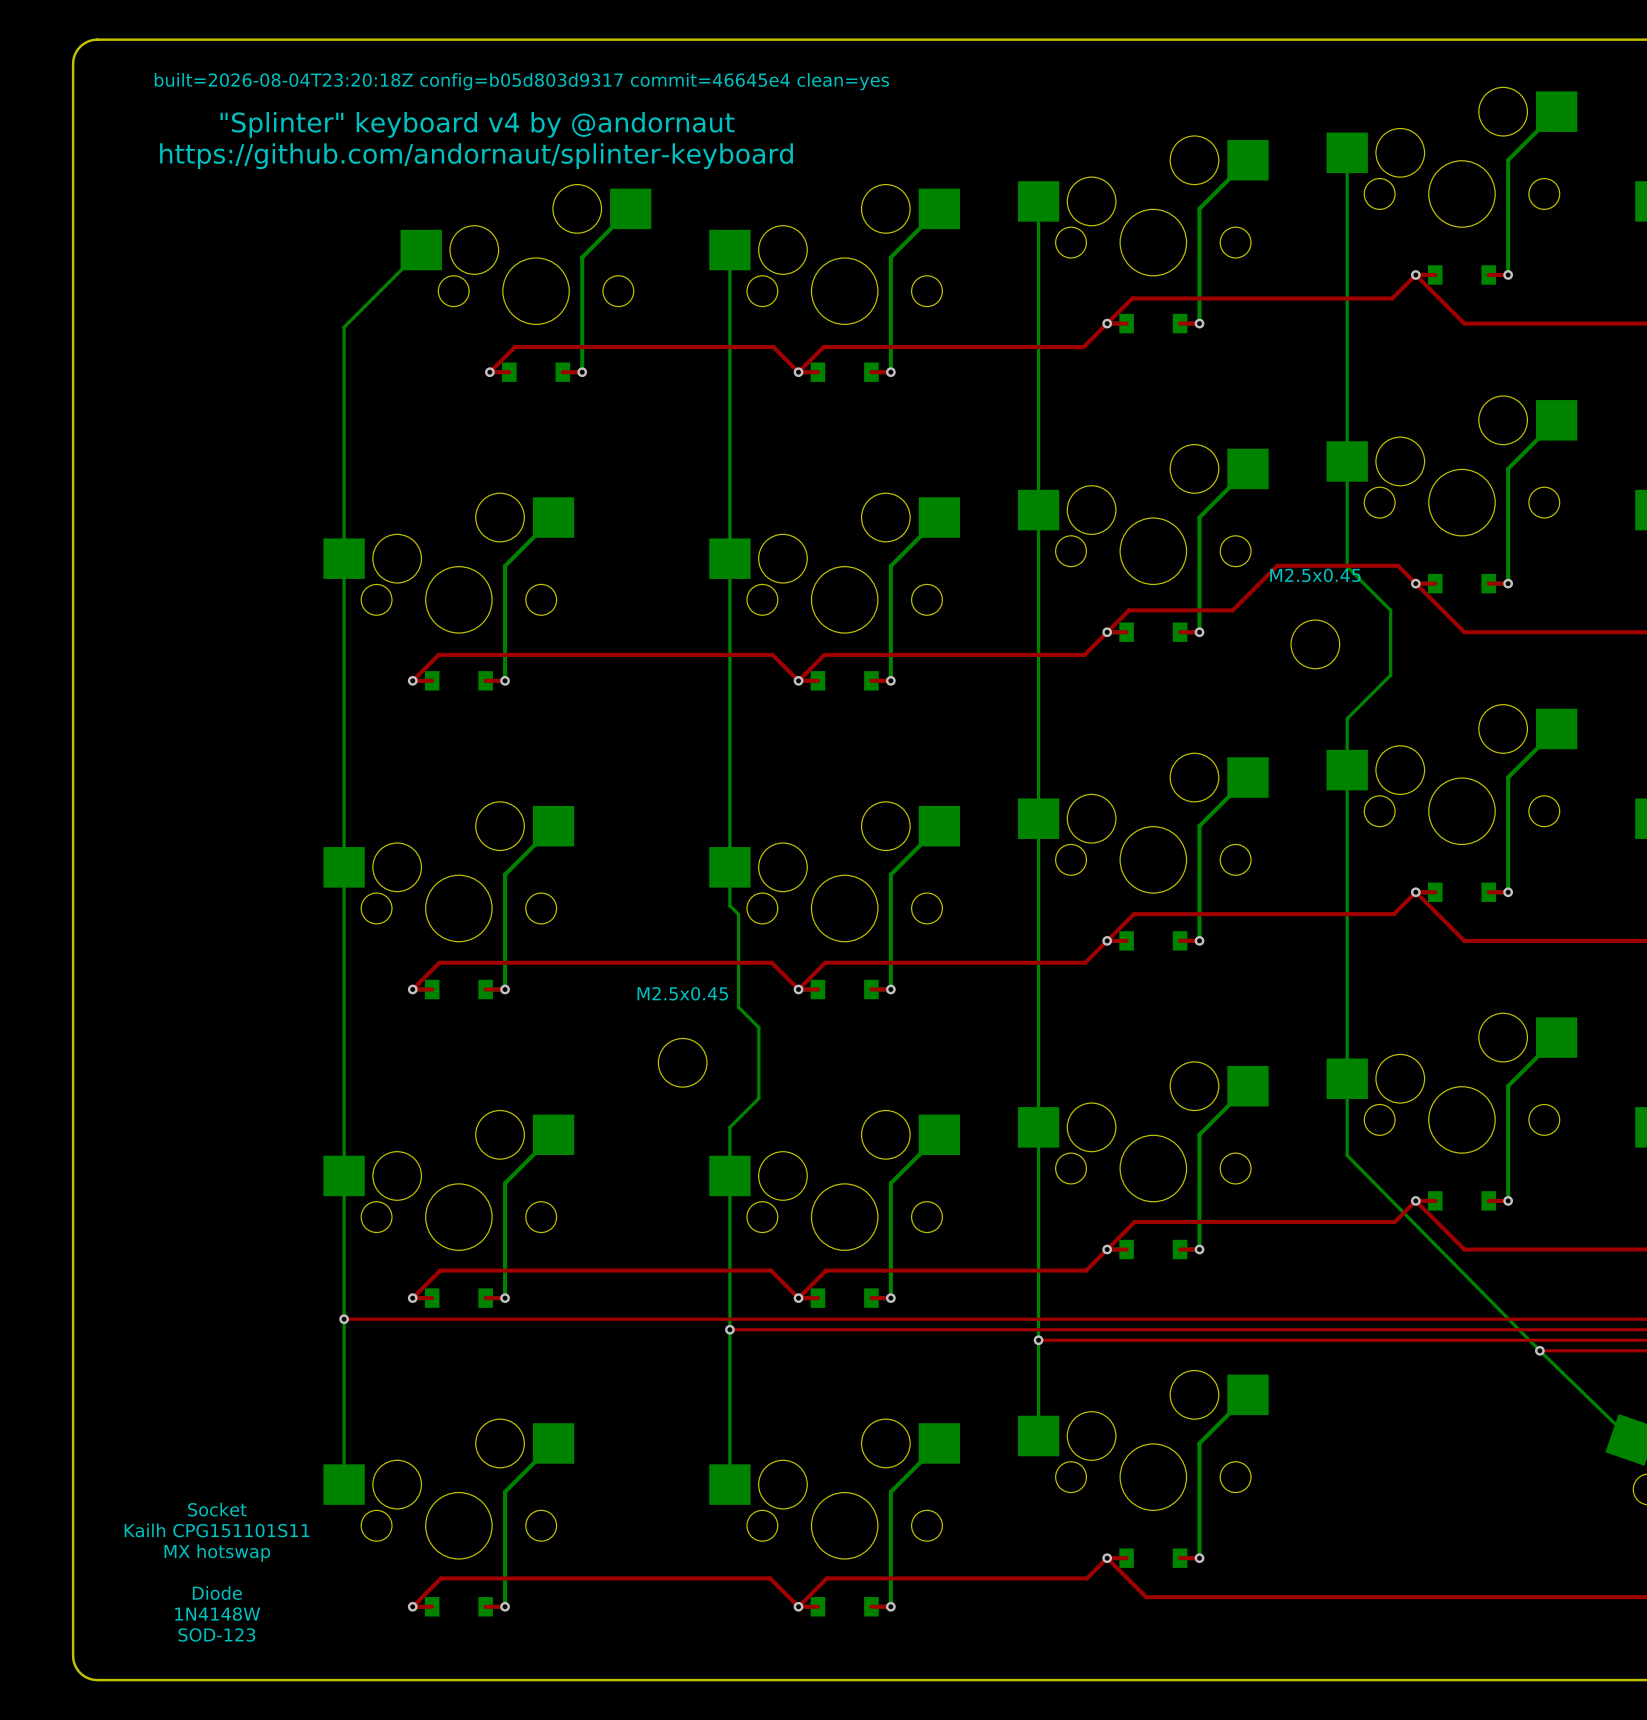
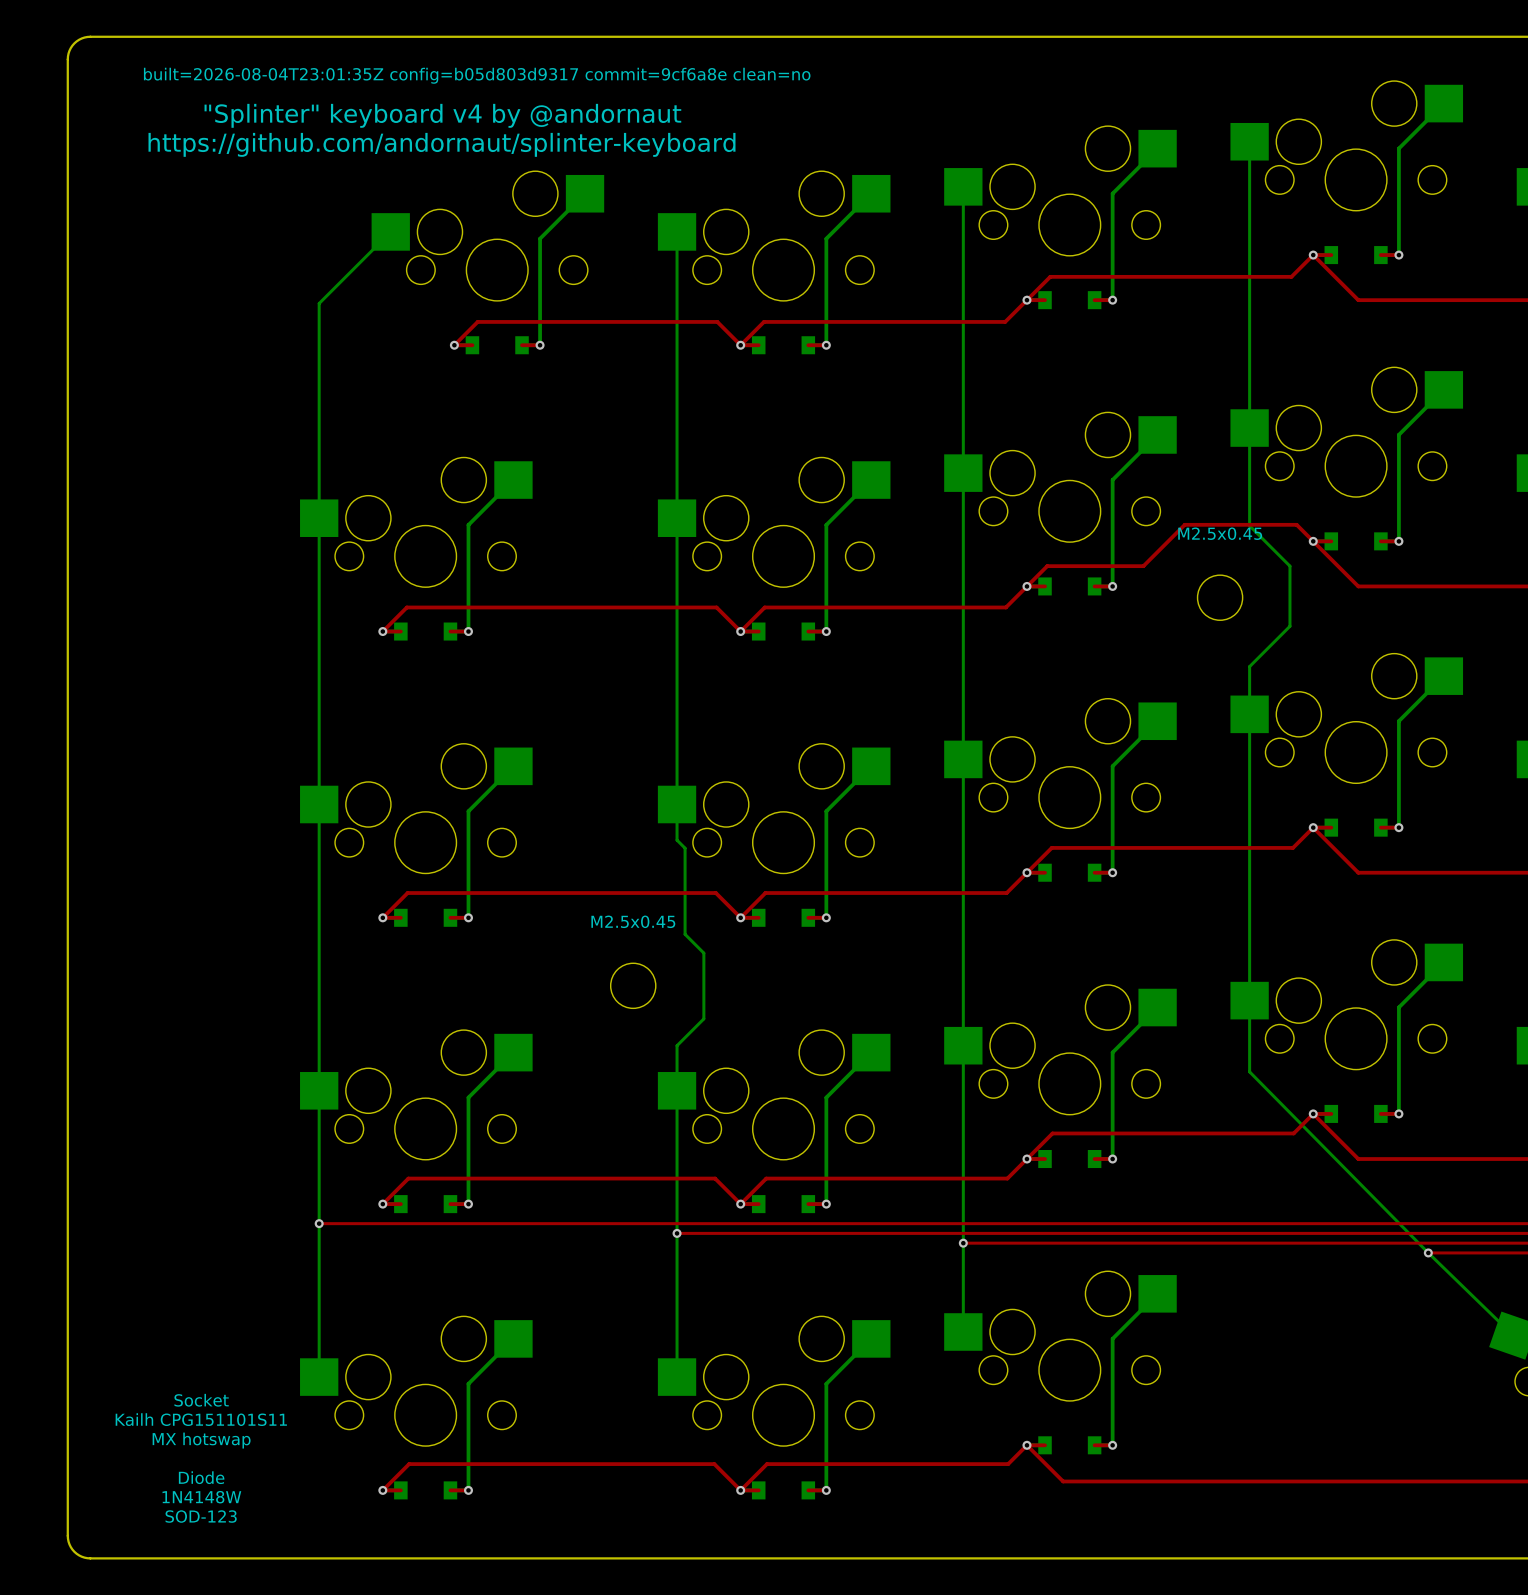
text: built=2026-08-04T23:20:18Z config=b05d803d9317 commit=46645e4 clean=yes (521, 81) -> built=2026-08-04T23:01:35Z config=b05d803d9317 commit=9cf6a8e clean=no (477, 75)

